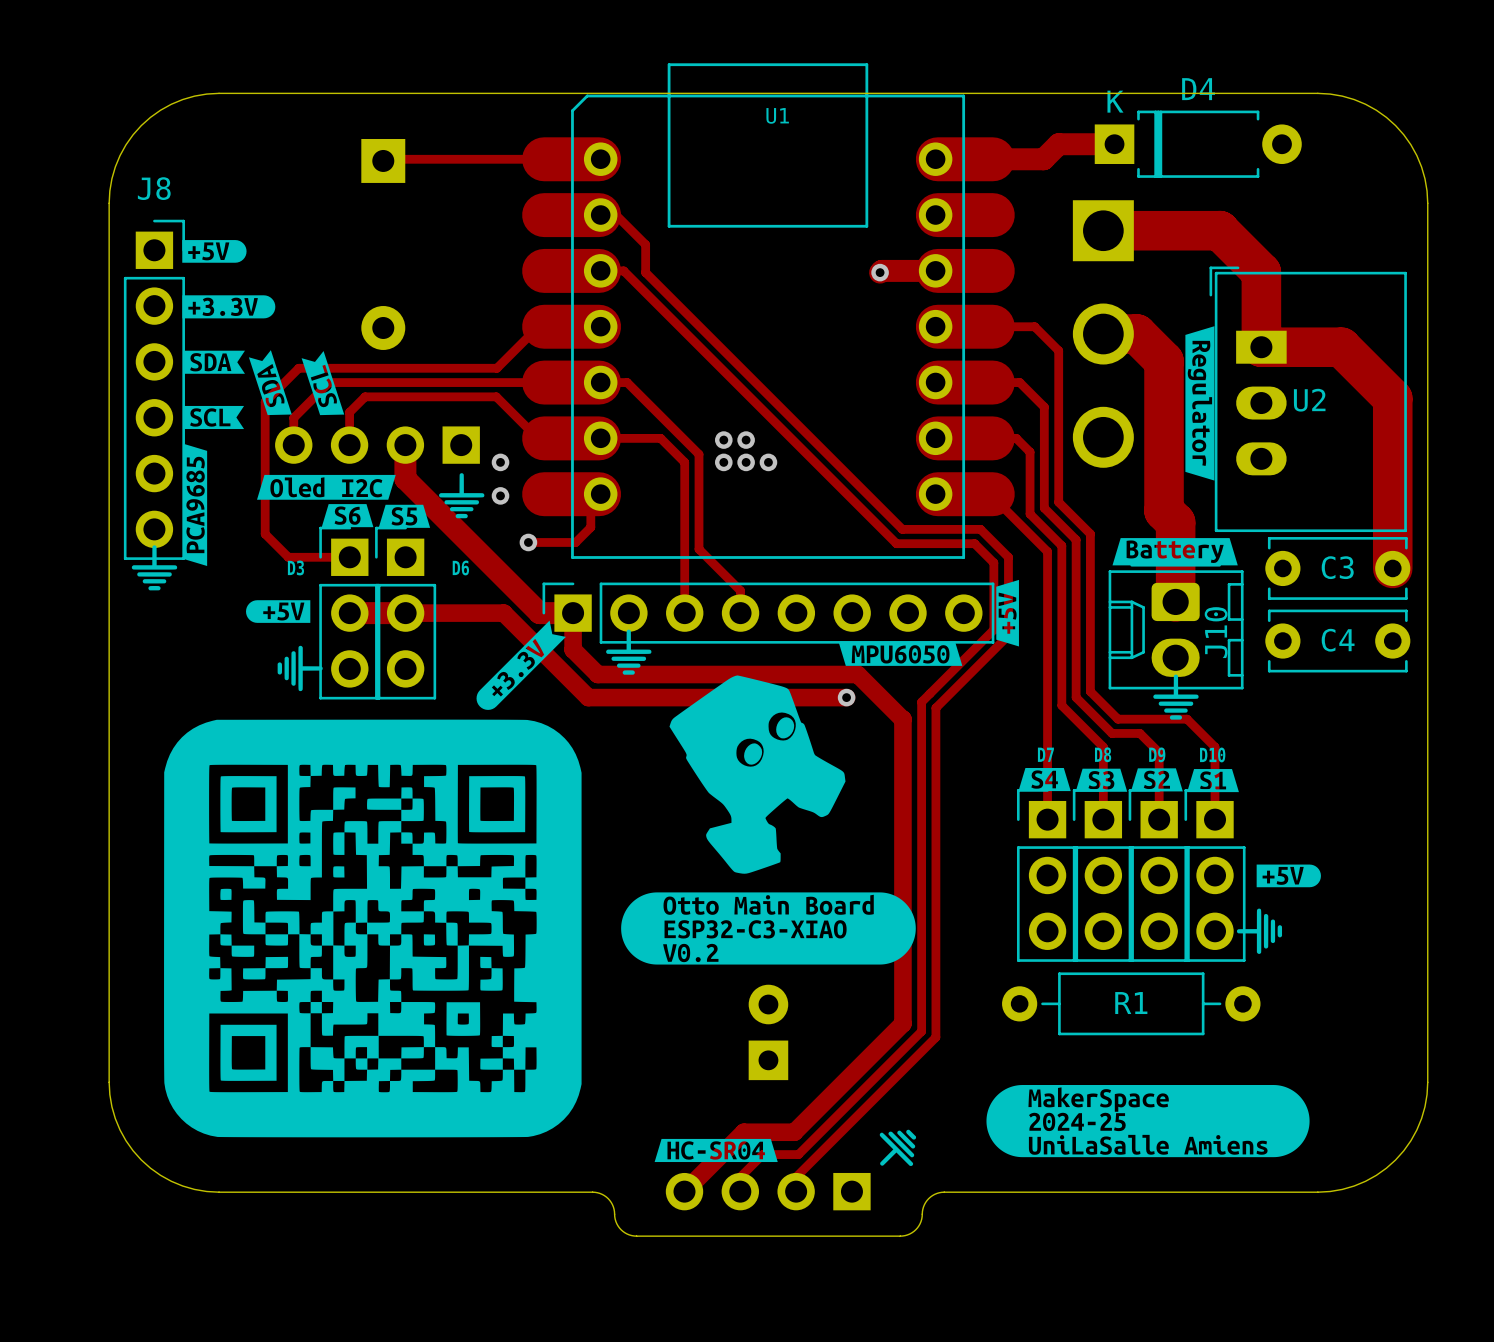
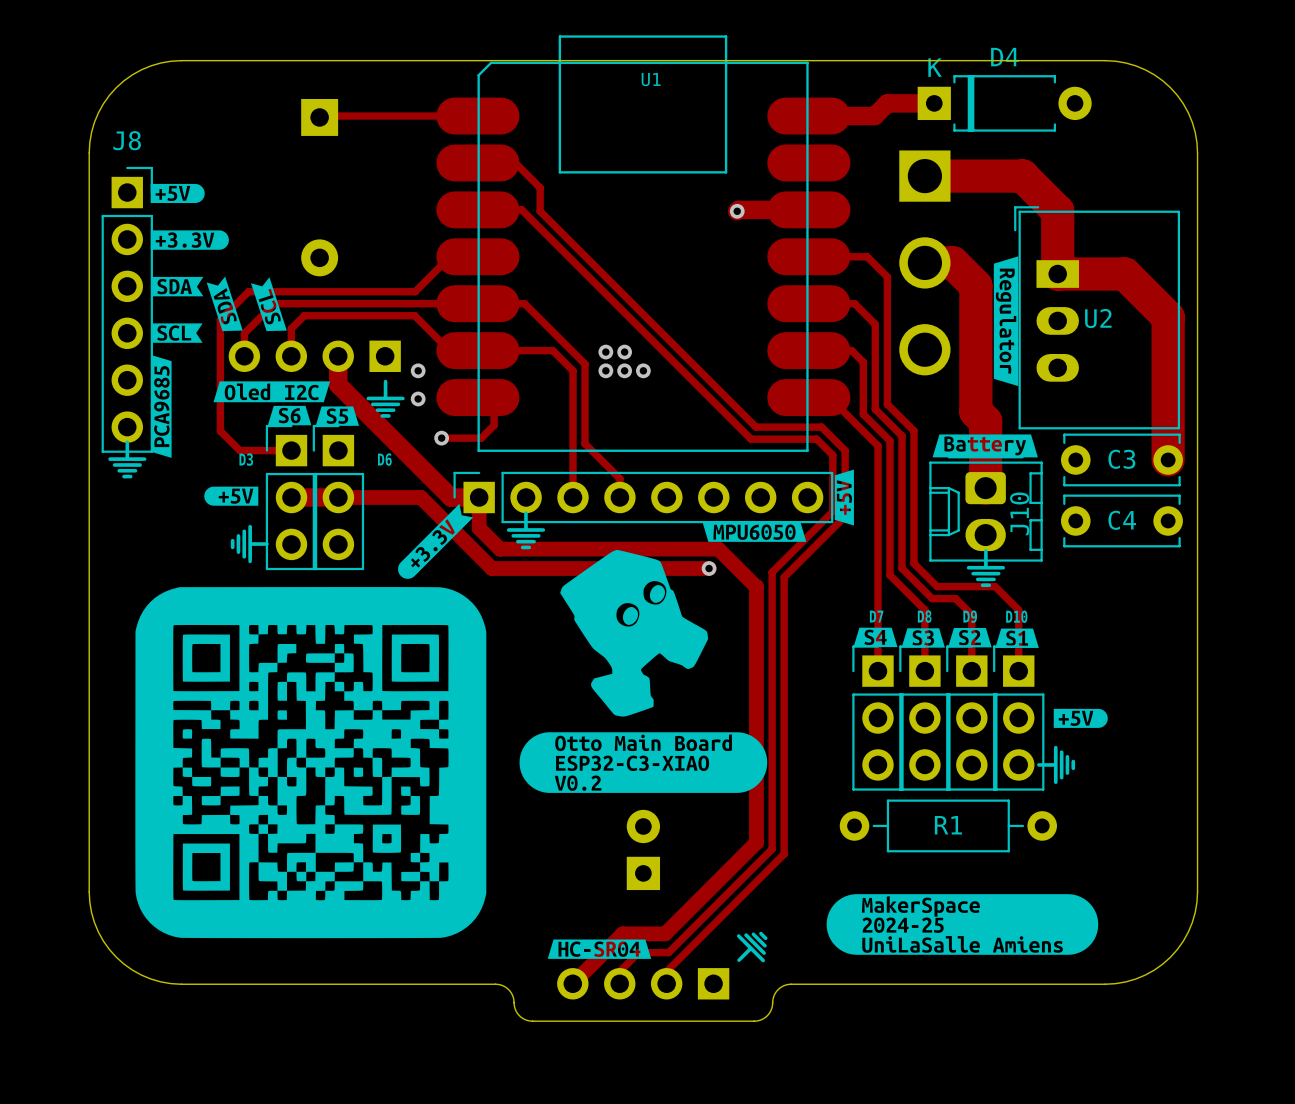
U1 footprint: [522, 63, 1015, 559] -> [436, 35, 851, 452]

